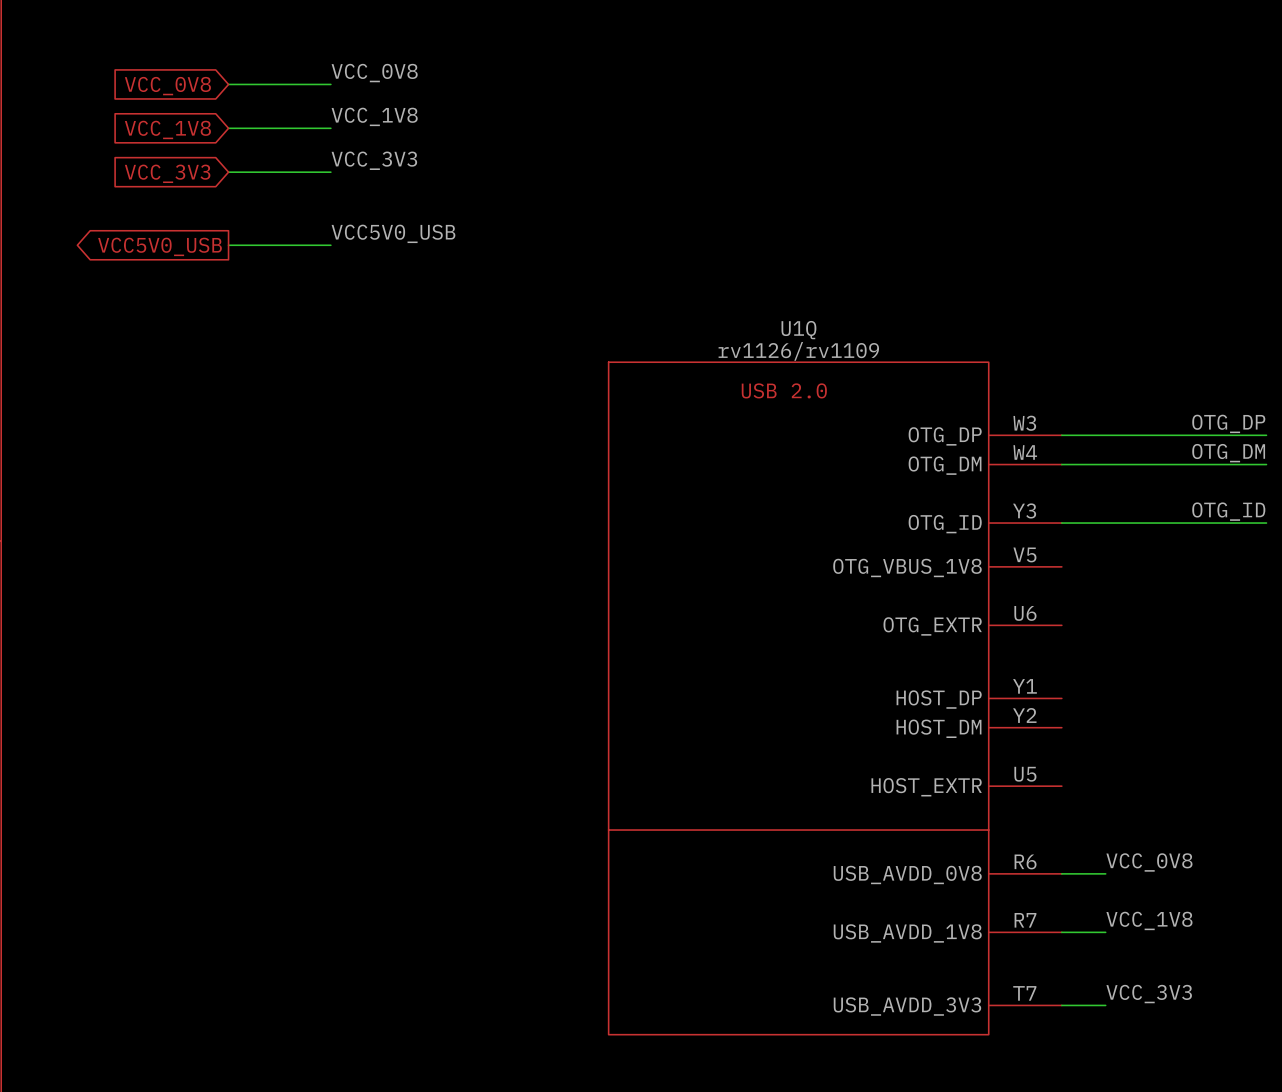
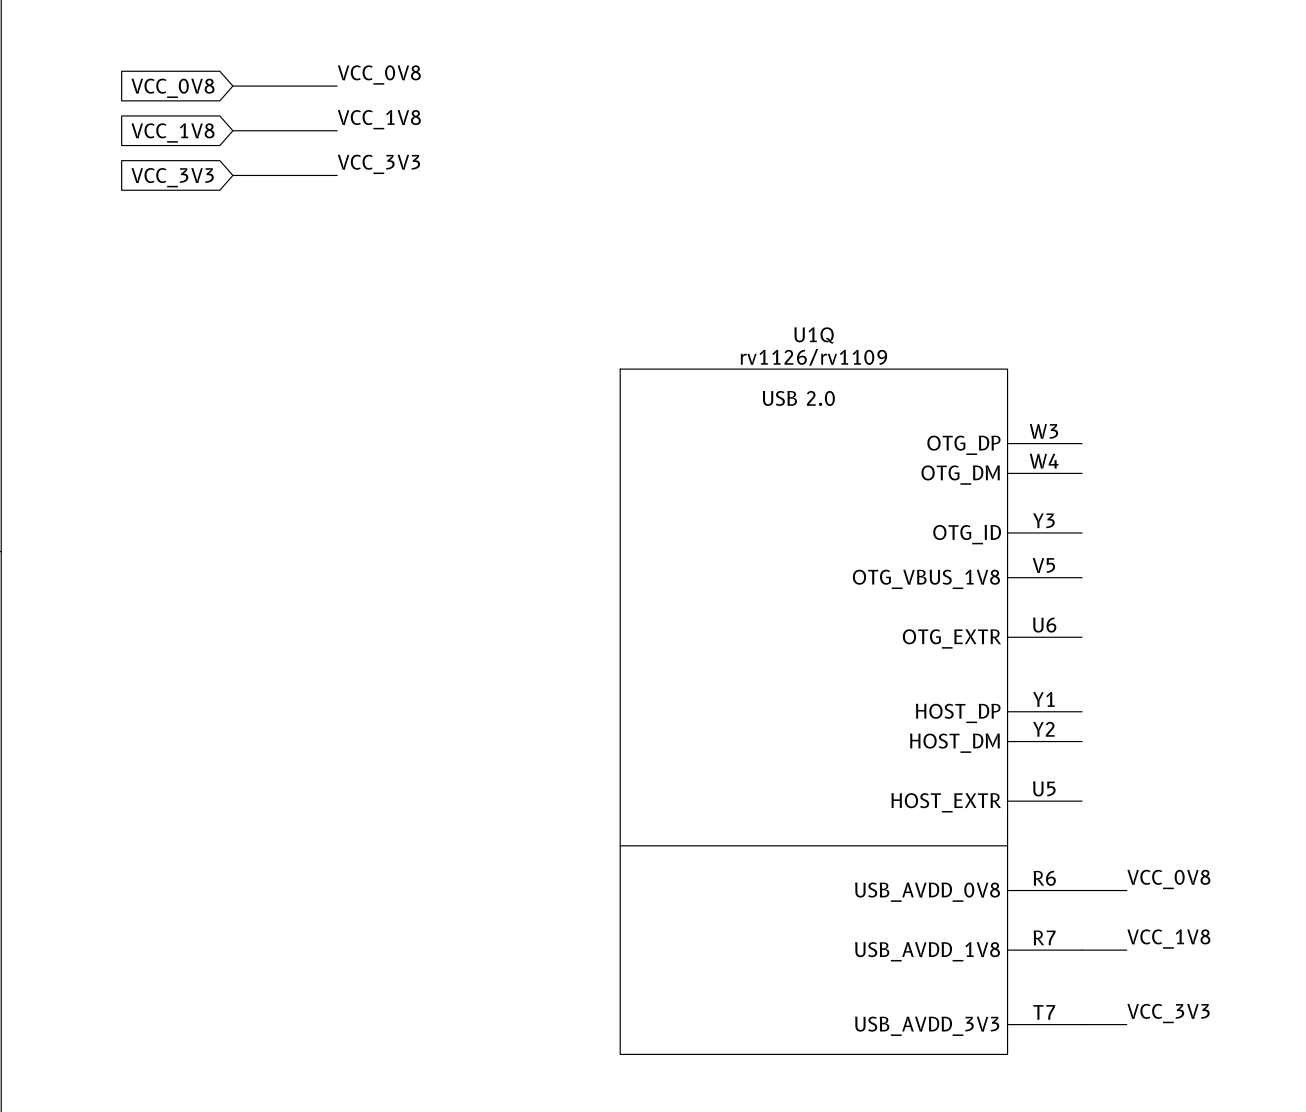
label: VCC5V0_USB (393, 233) -> none
wire: (228, 245) (330, 245) -> none
global label: VCC5V0_USB (160, 246) -> none
label: OTG_DP (1228, 423) -> none
wire: (1061, 435) (1266, 435) -> none
label: OTG_DM (1228, 453) -> none
wire: (1061, 464) (1266, 464) -> none
label: OTG_ID (1228, 511) -> none
wire: (1061, 523) (1266, 523) -> none

